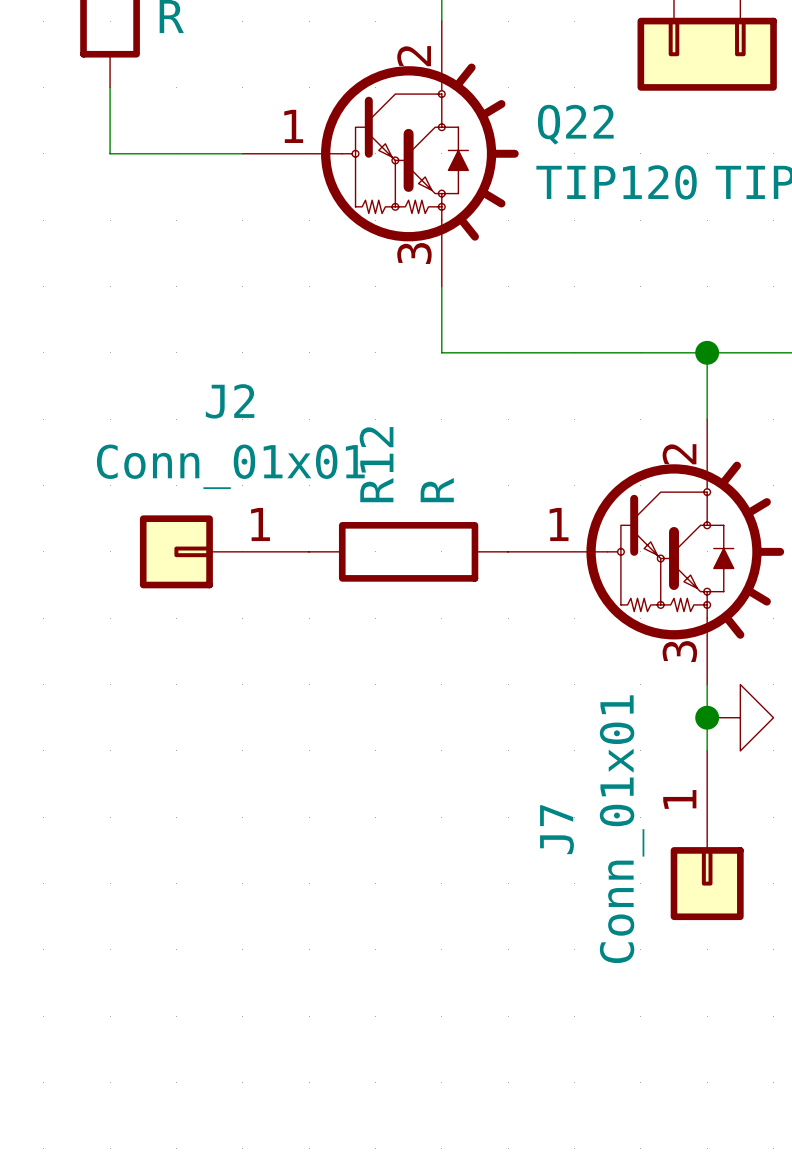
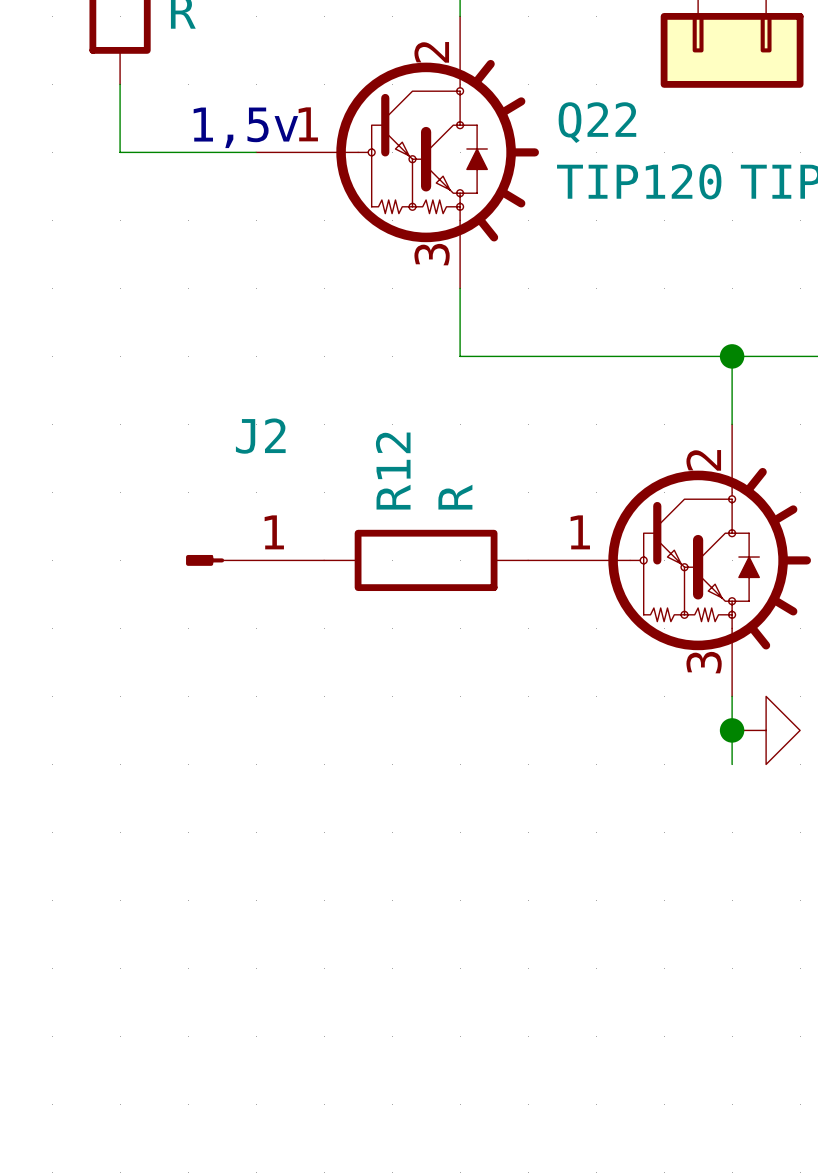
text: none -> 1,5v (245, 127)
J2 value: Conn_01x01 (230, 466) -> none
J2 symbol: [139, 515, 310, 589] -> [186, 554, 325, 566]
J7: Conn_01x01 (707, 835) -> none

